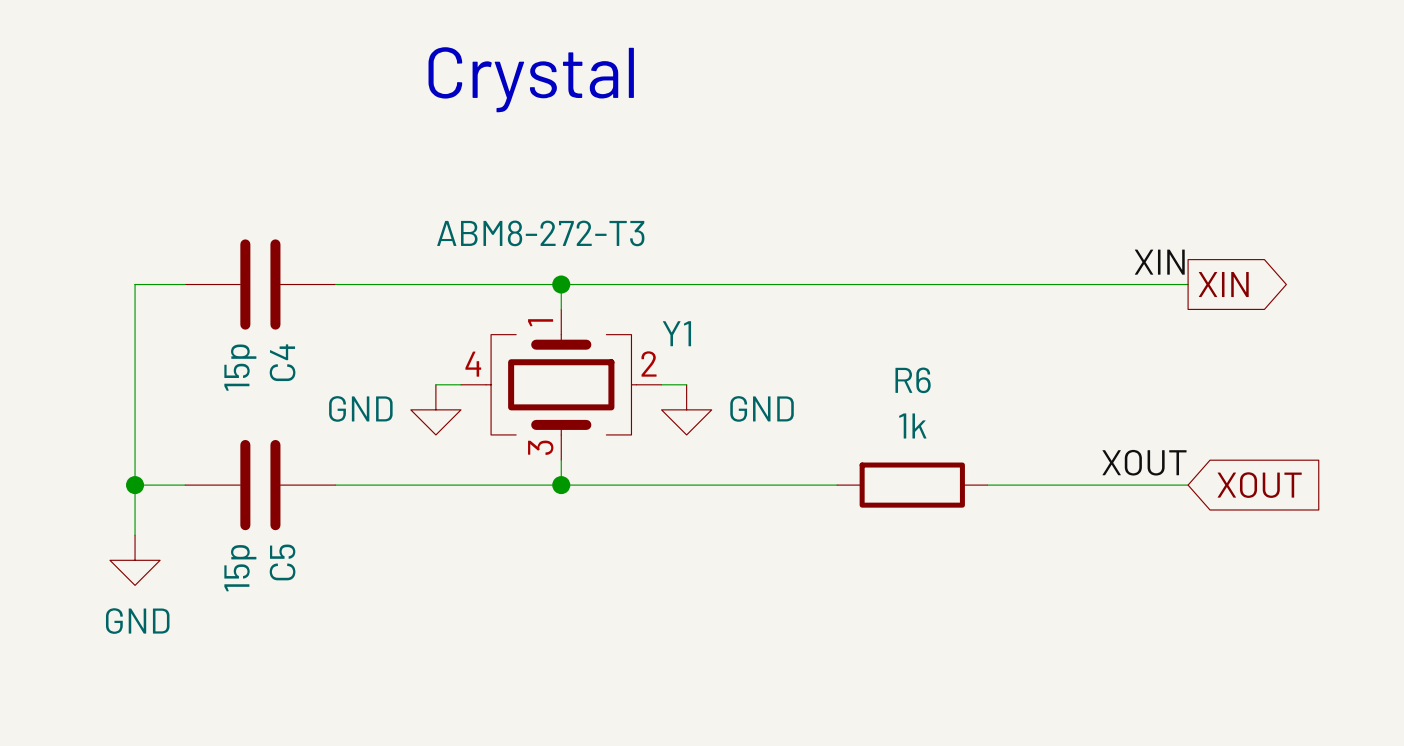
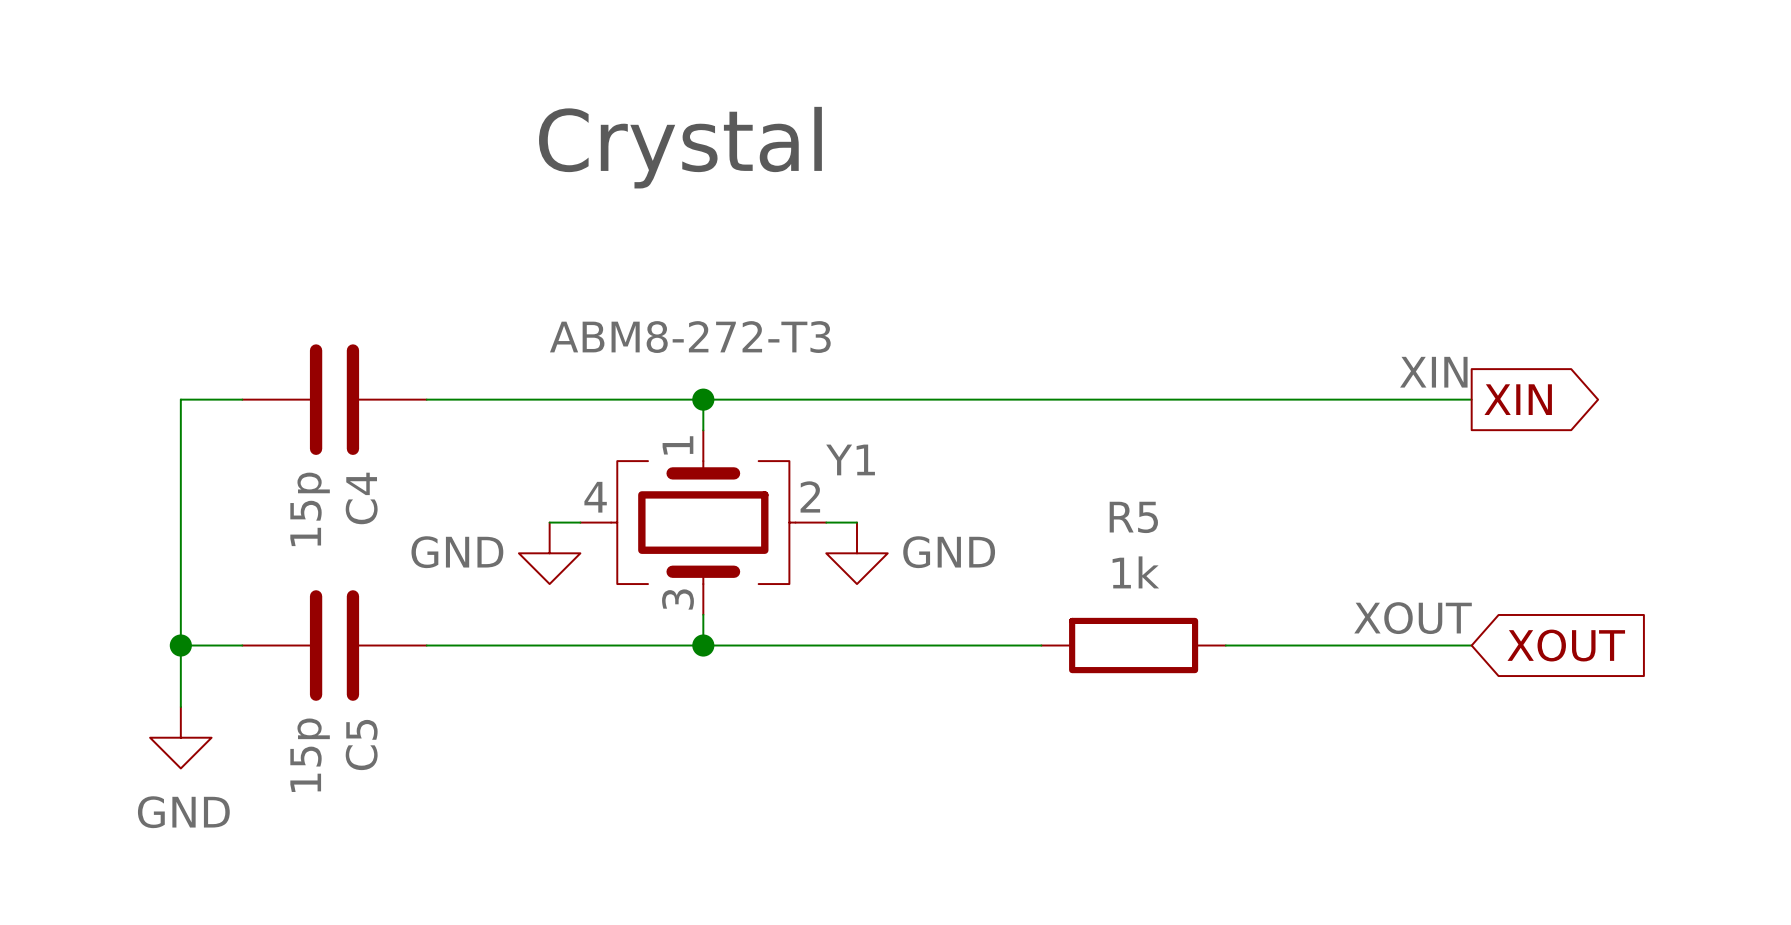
R6 name: R6 (913, 380) -> R5 (1133, 517)

